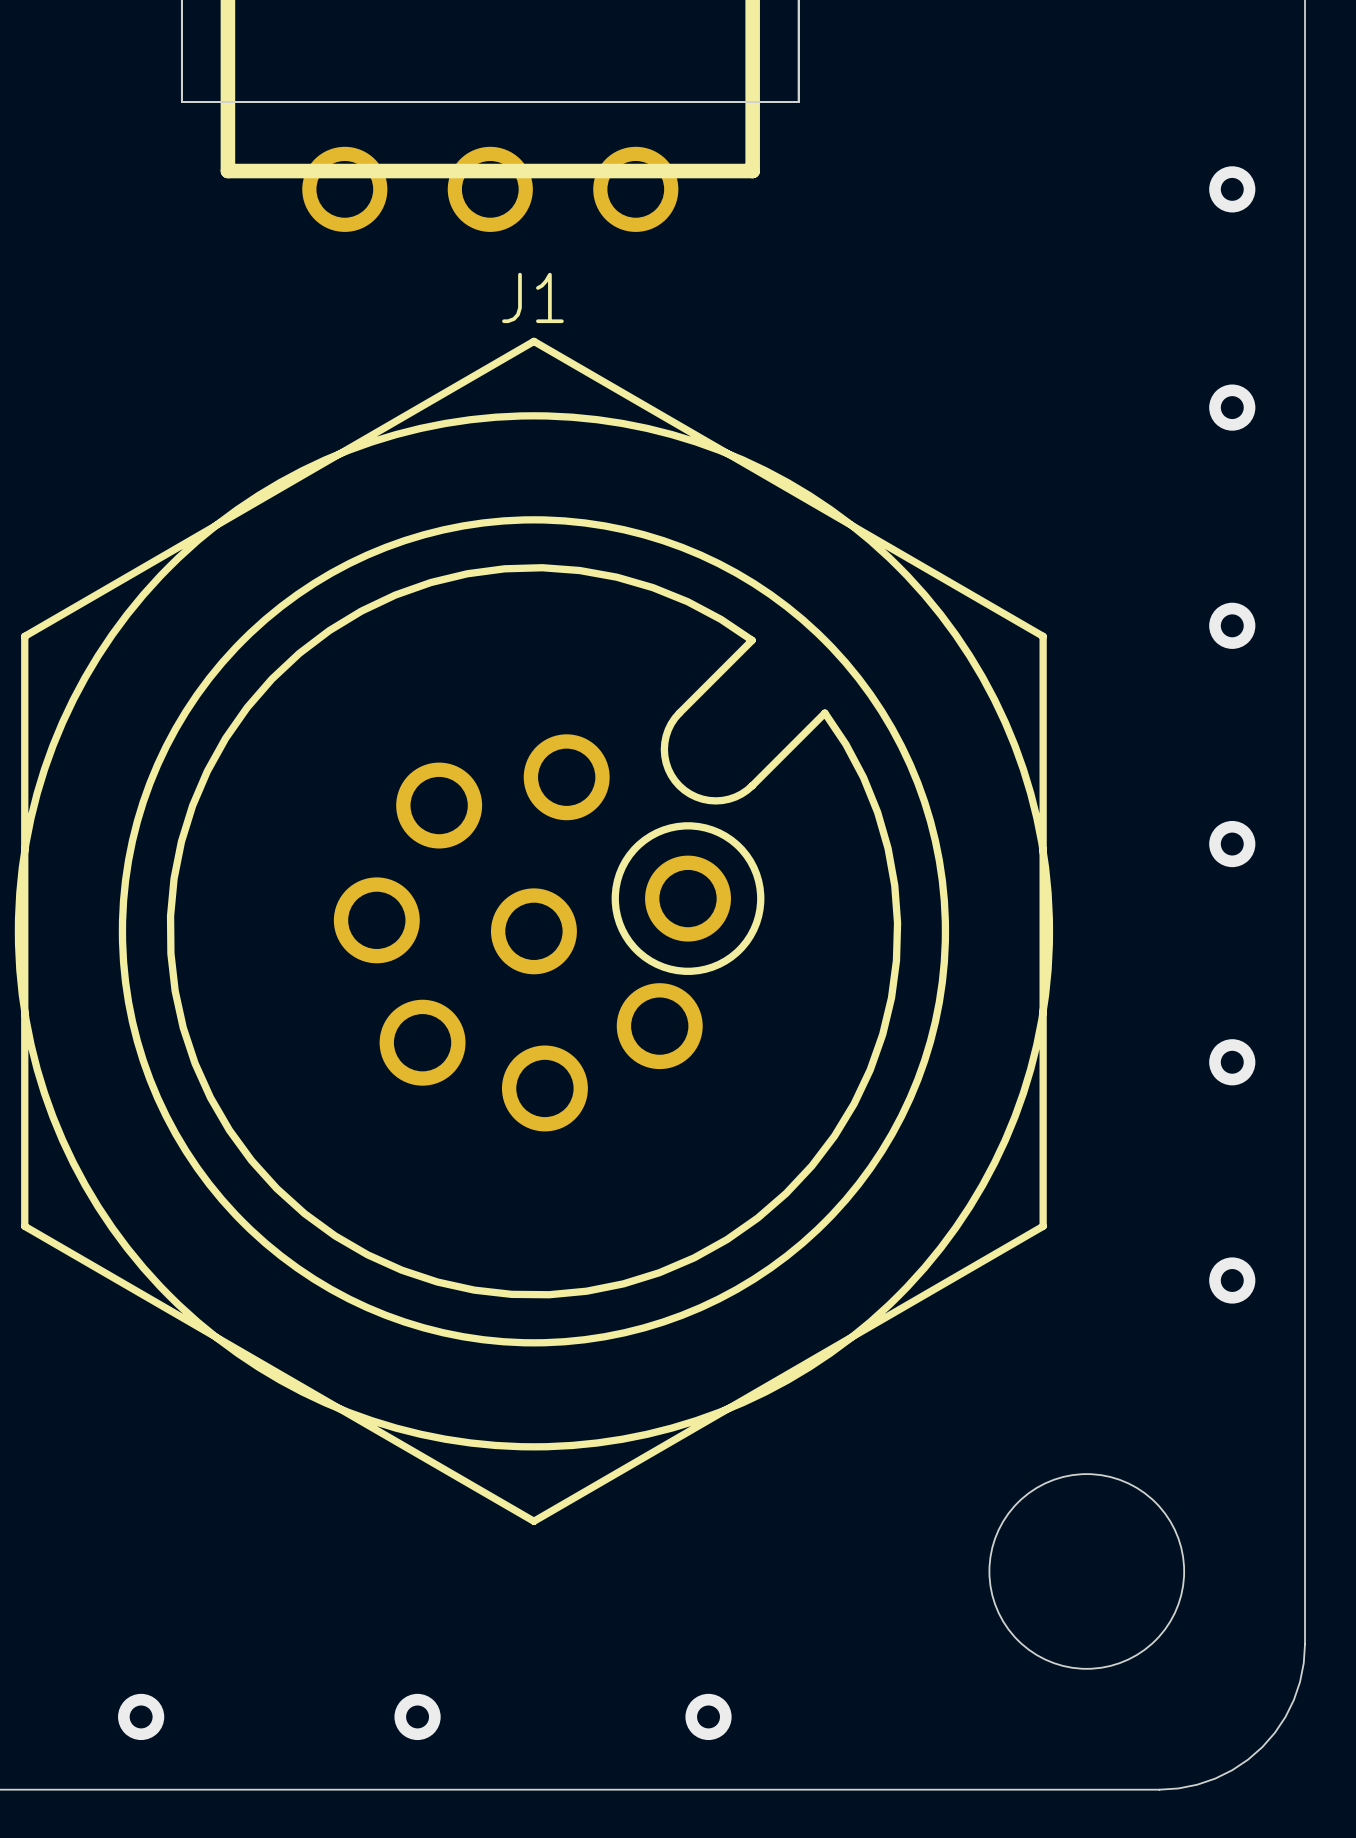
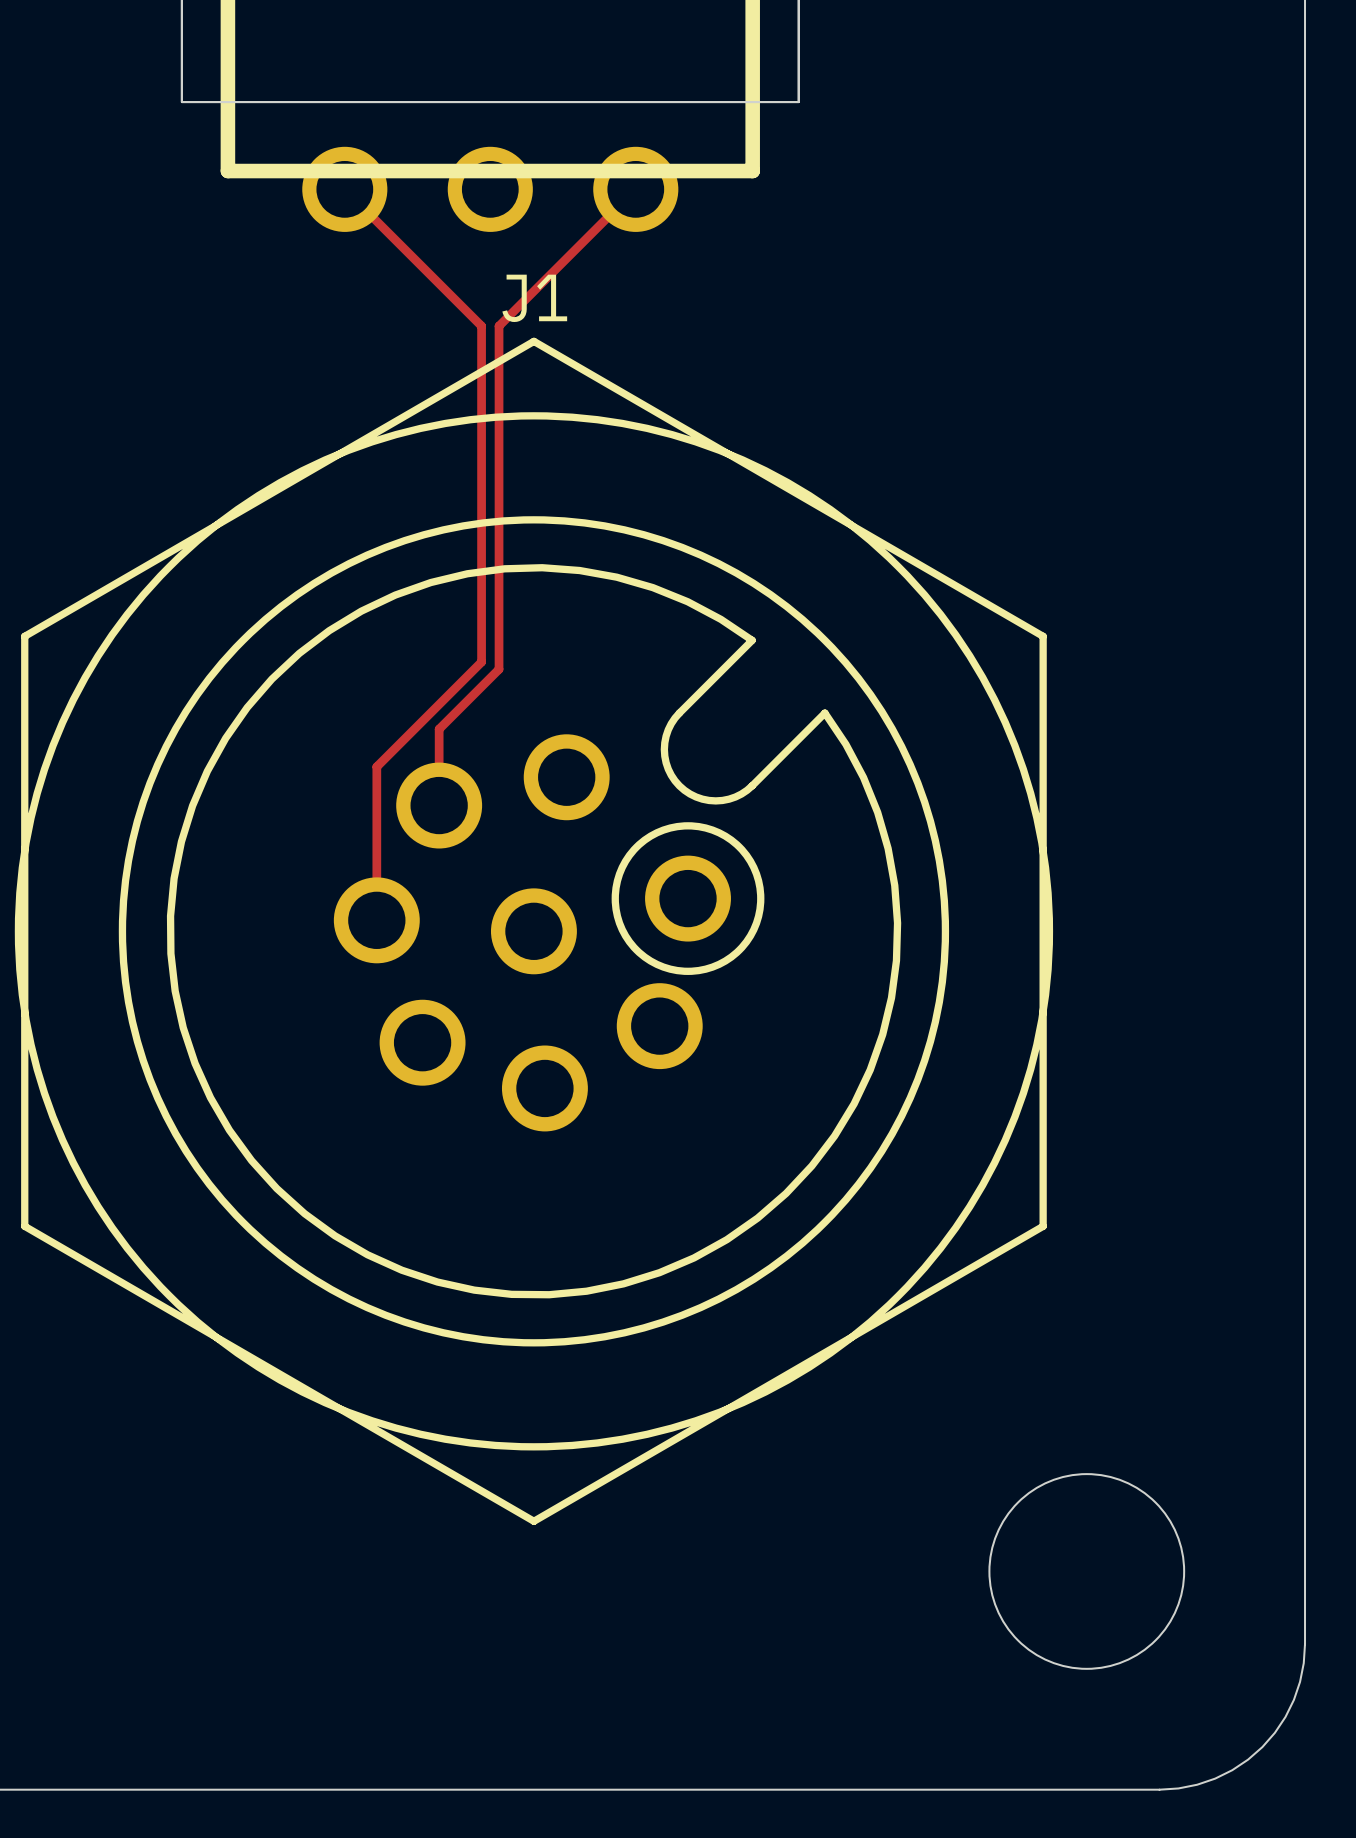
top track: none -> (344, 189) (481, 326) (481, 662) (376, 766) (376, 920)
top track: none -> (635, 189) (499, 326) (499, 669) (439, 729) (439, 805)
via: (1232, 189) -> none
via: (1232, 407) -> none
via: (1232, 625) -> none
via: (1232, 844) -> none
via: (1232, 1062) -> none
via: (1232, 1280) -> none
via: (141, 1716) -> none
via: (417, 1716) -> none
via: (708, 1716) -> none

